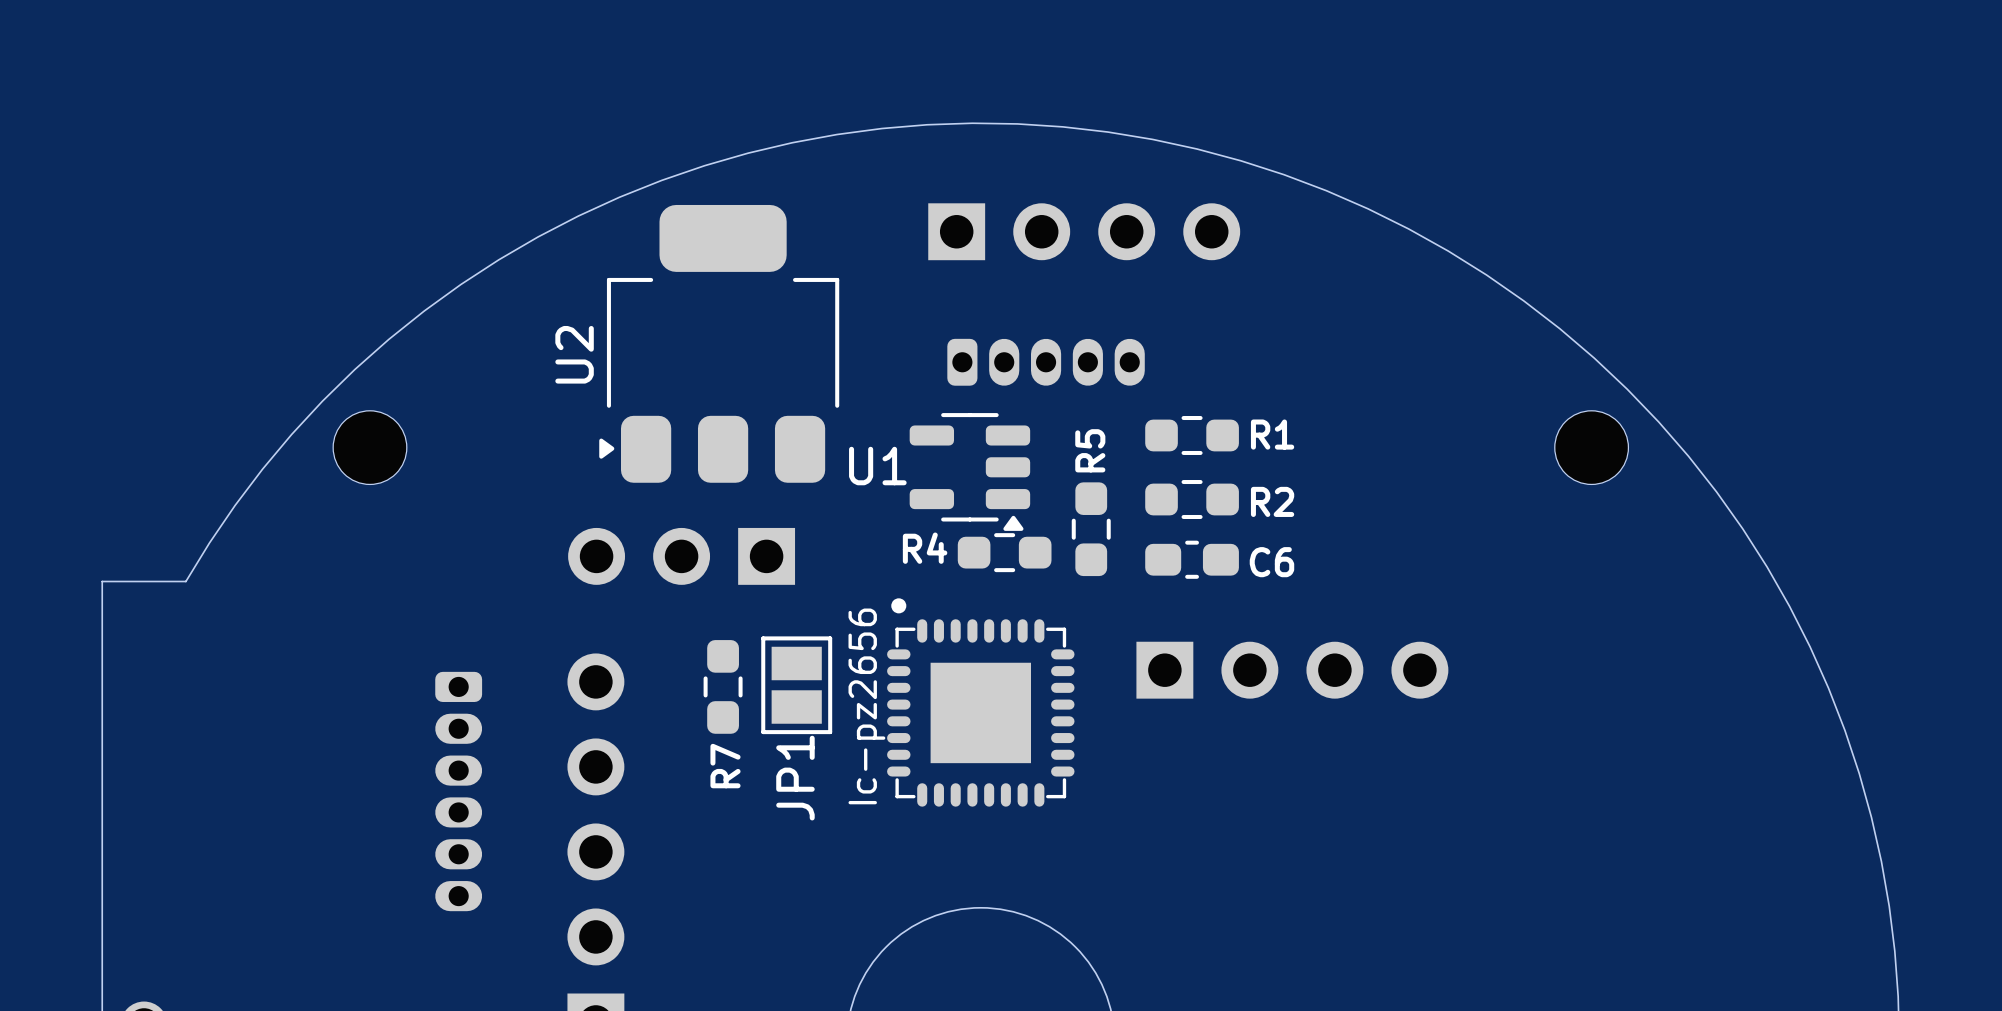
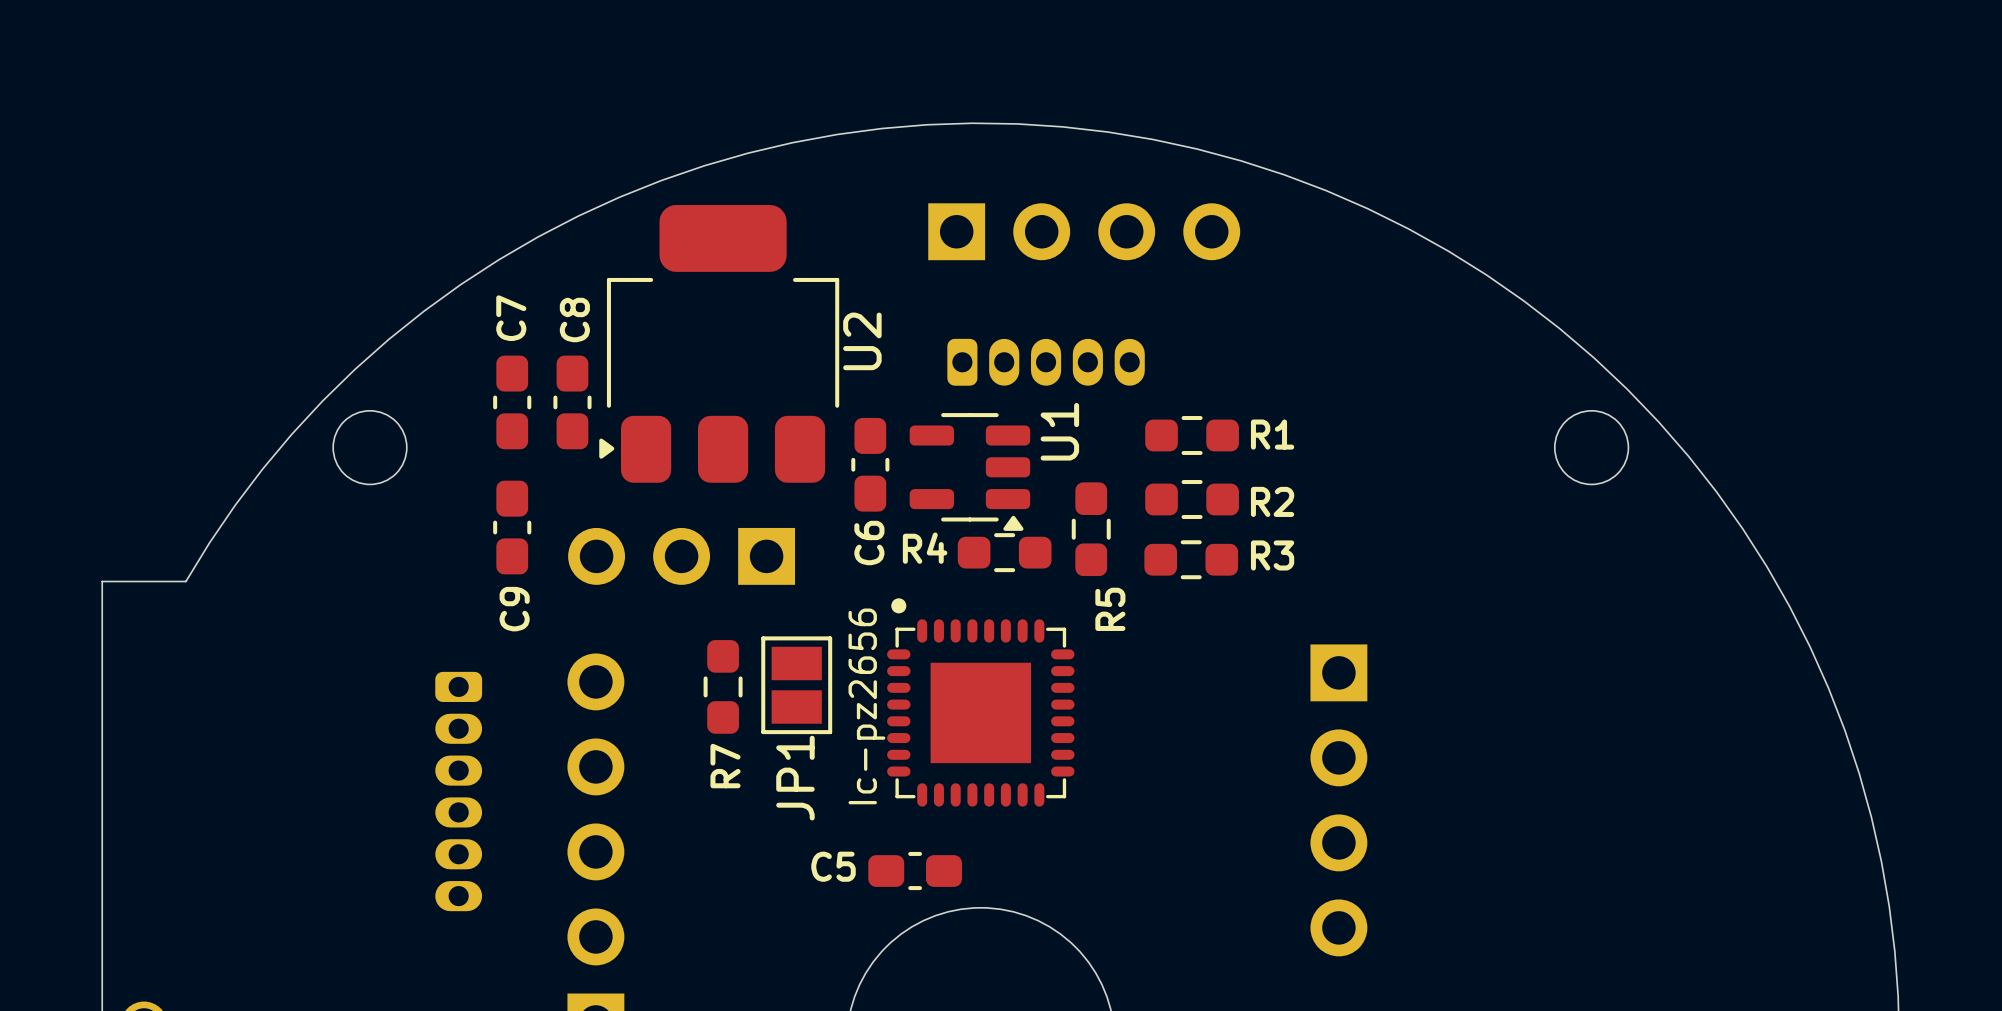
U2 name position: U2 (574, 354) -> U2 (862, 341)
C7: none -> (512, 402)
C8: none -> (572, 402)
R5 name position: R5 (1090, 450) -> R5 (1110, 609)
U1 name rotation: 0° (877, 466) -> 90° counterclockwise (1059, 431)
U1 name position: U1 (877, 466) -> U1 (1059, 431)
C9: none -> (512, 527)
R3: none -> (1191, 559)
C6 rotation: 0° (1192, 559) -> 90° clockwise (870, 464)
C6 position: (1192, 559) -> (870, 464)
part rotation: 0° (1292, 670) -> 90° clockwise (1338, 800)
C5: none -> (915, 871)

